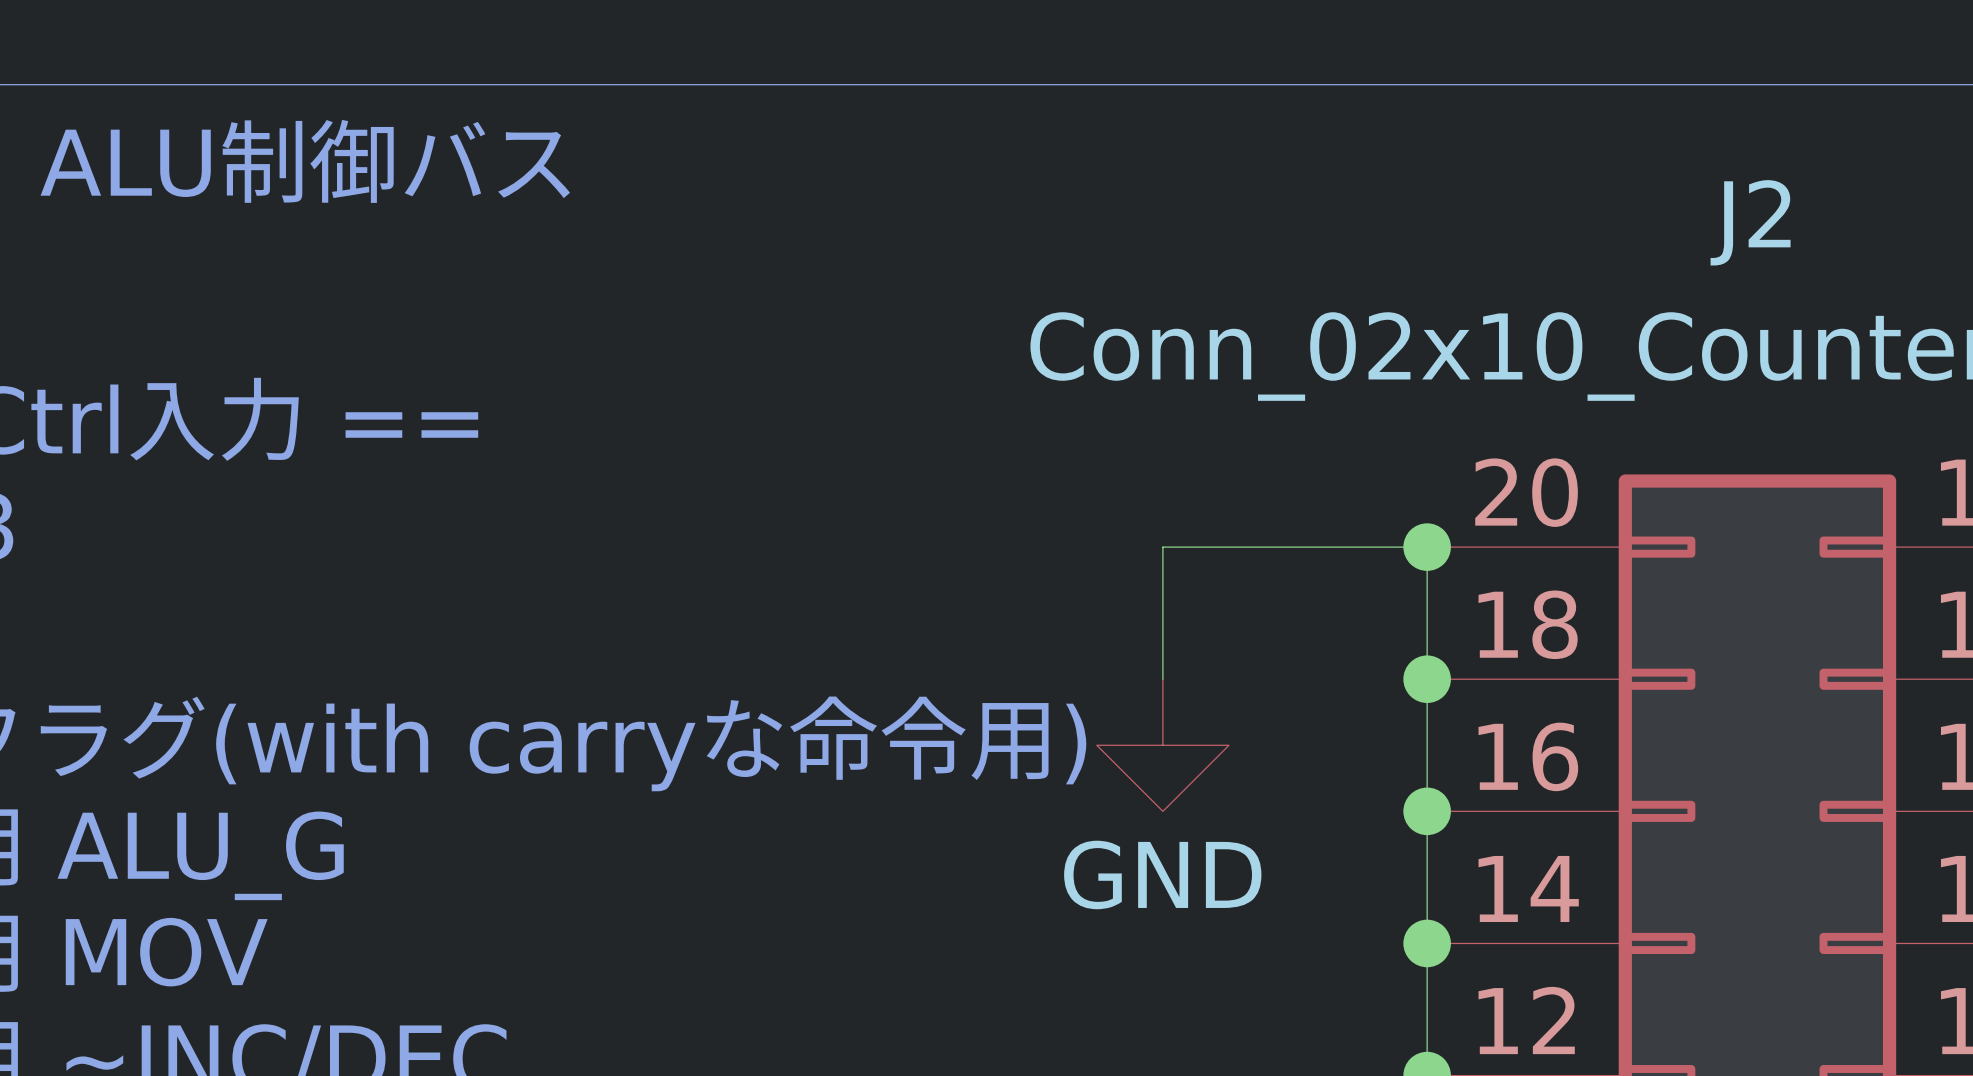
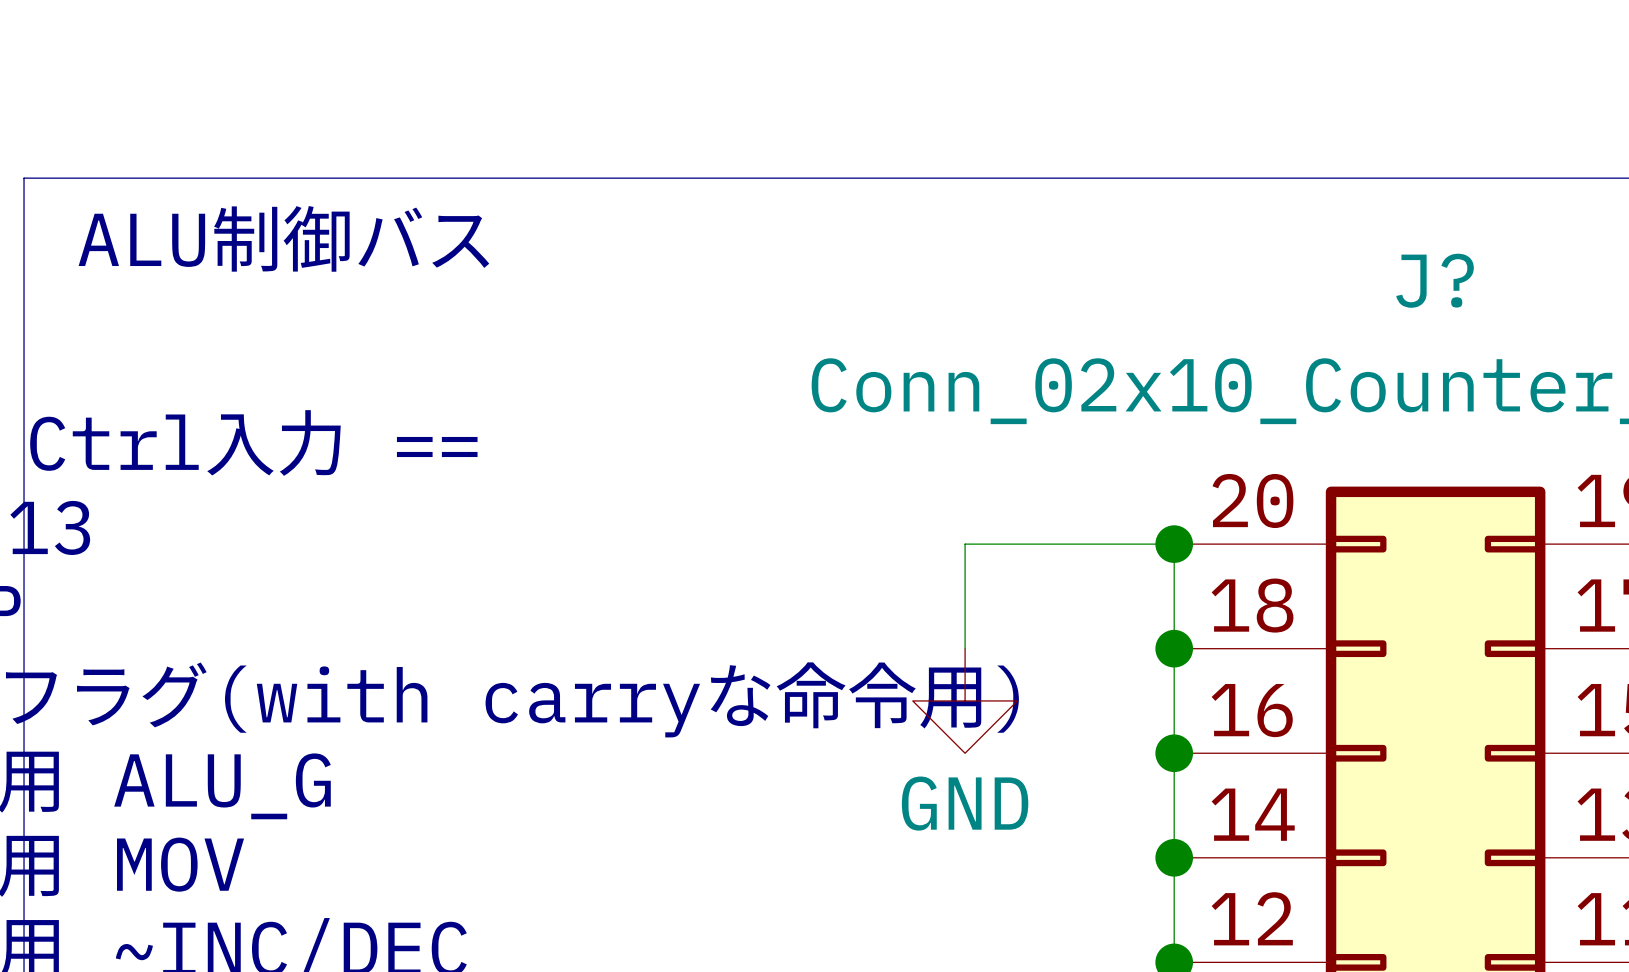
J2 name: J2 (1750, 222) -> J? (1435, 280)

